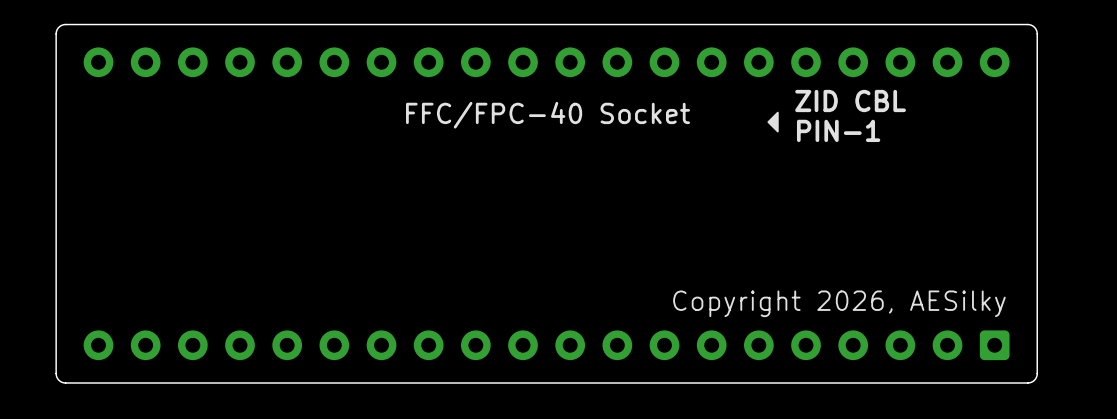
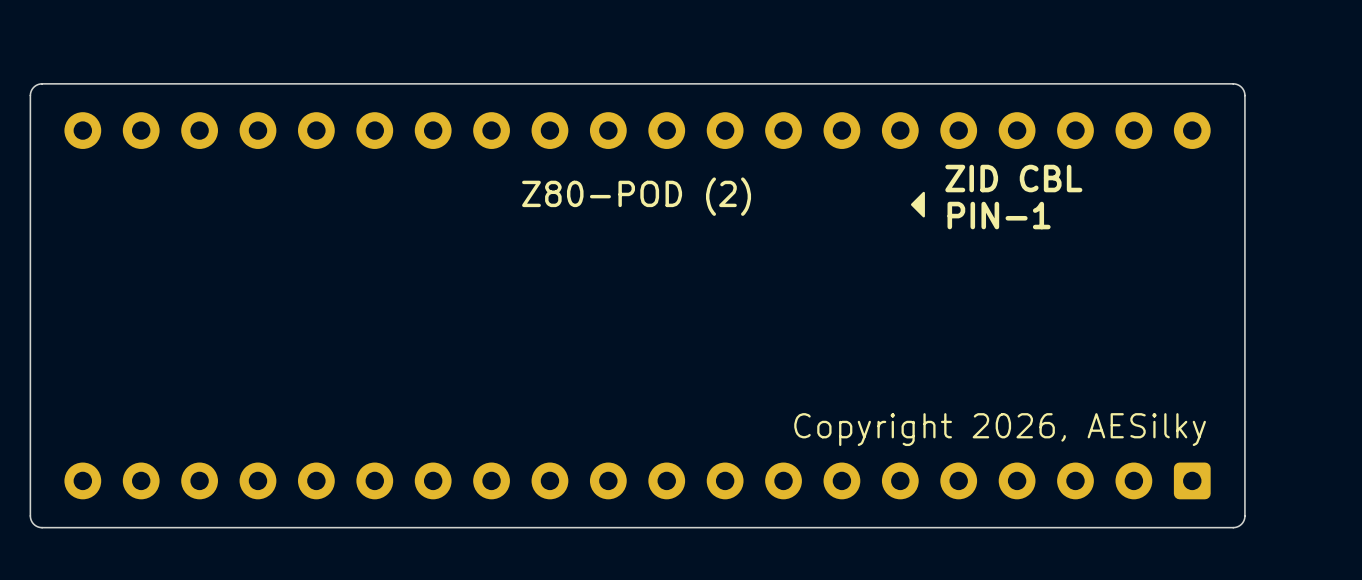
part value: FFC/FPC-40 Socket (548, 115) -> Z80-POD (2) (636, 196)

